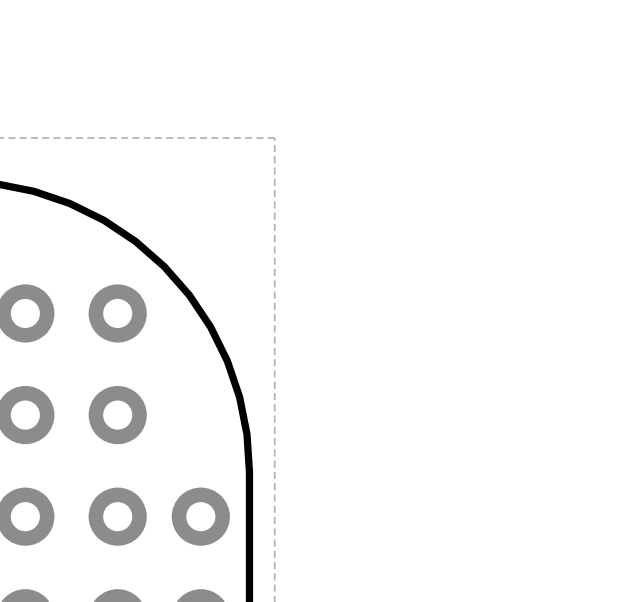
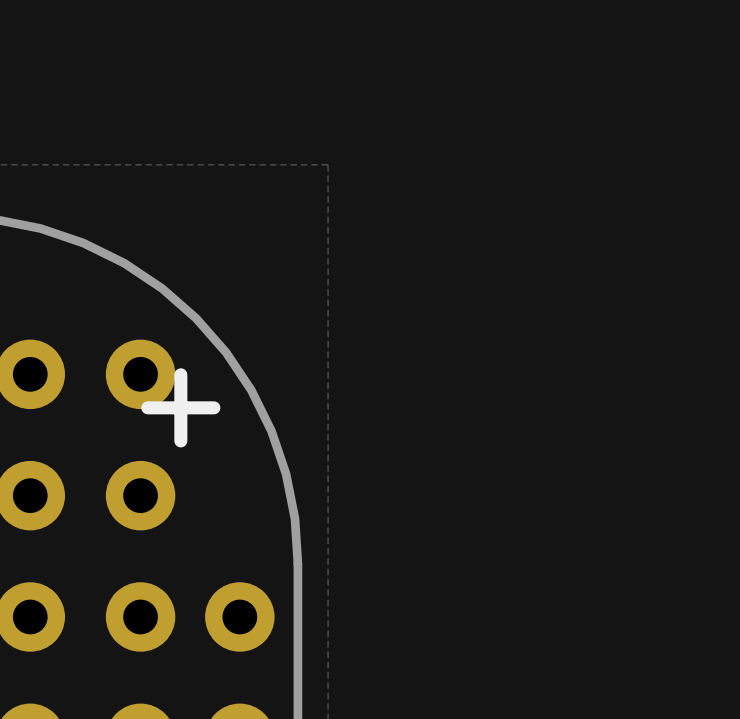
text: none -> + (180, 407)

